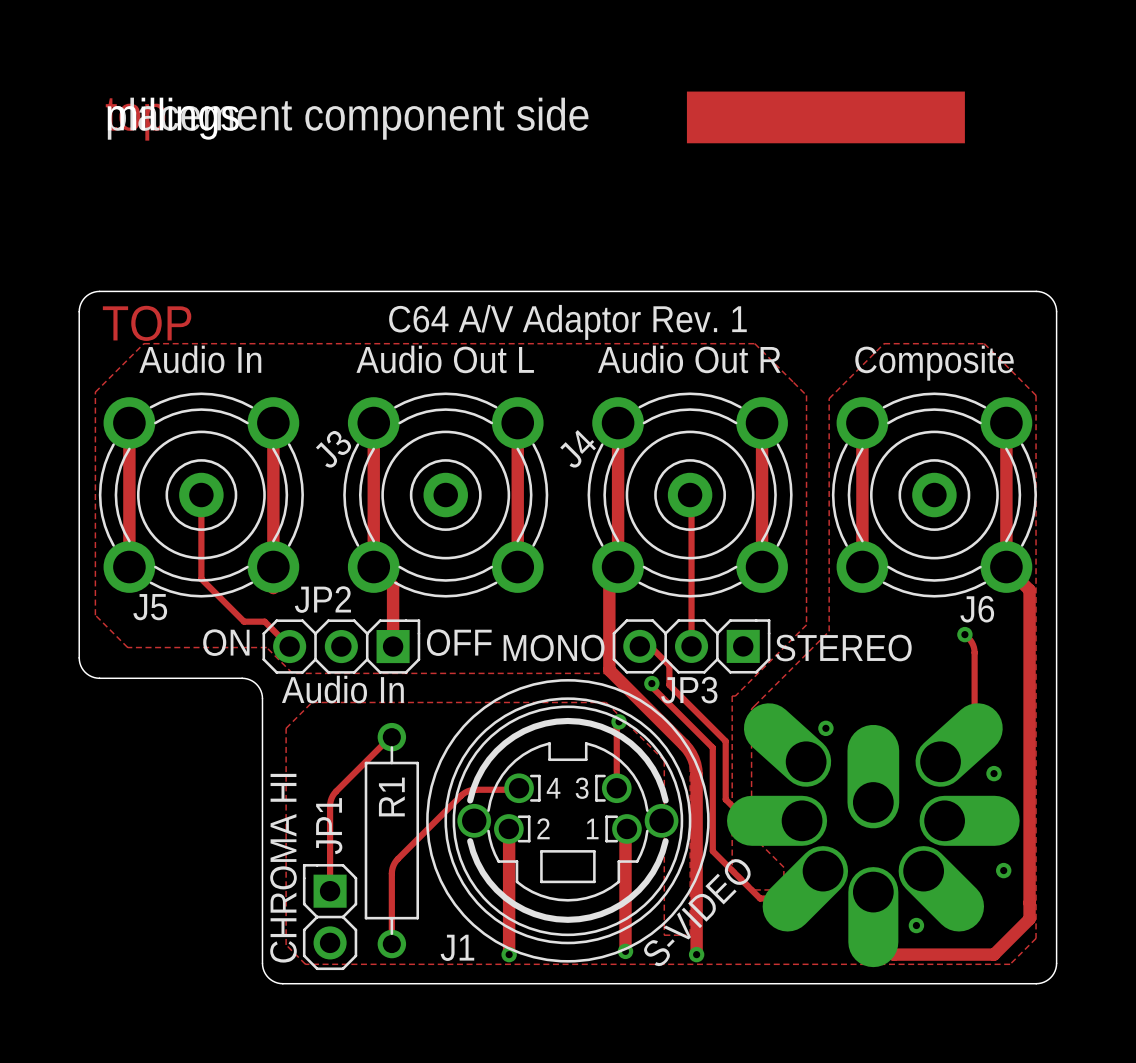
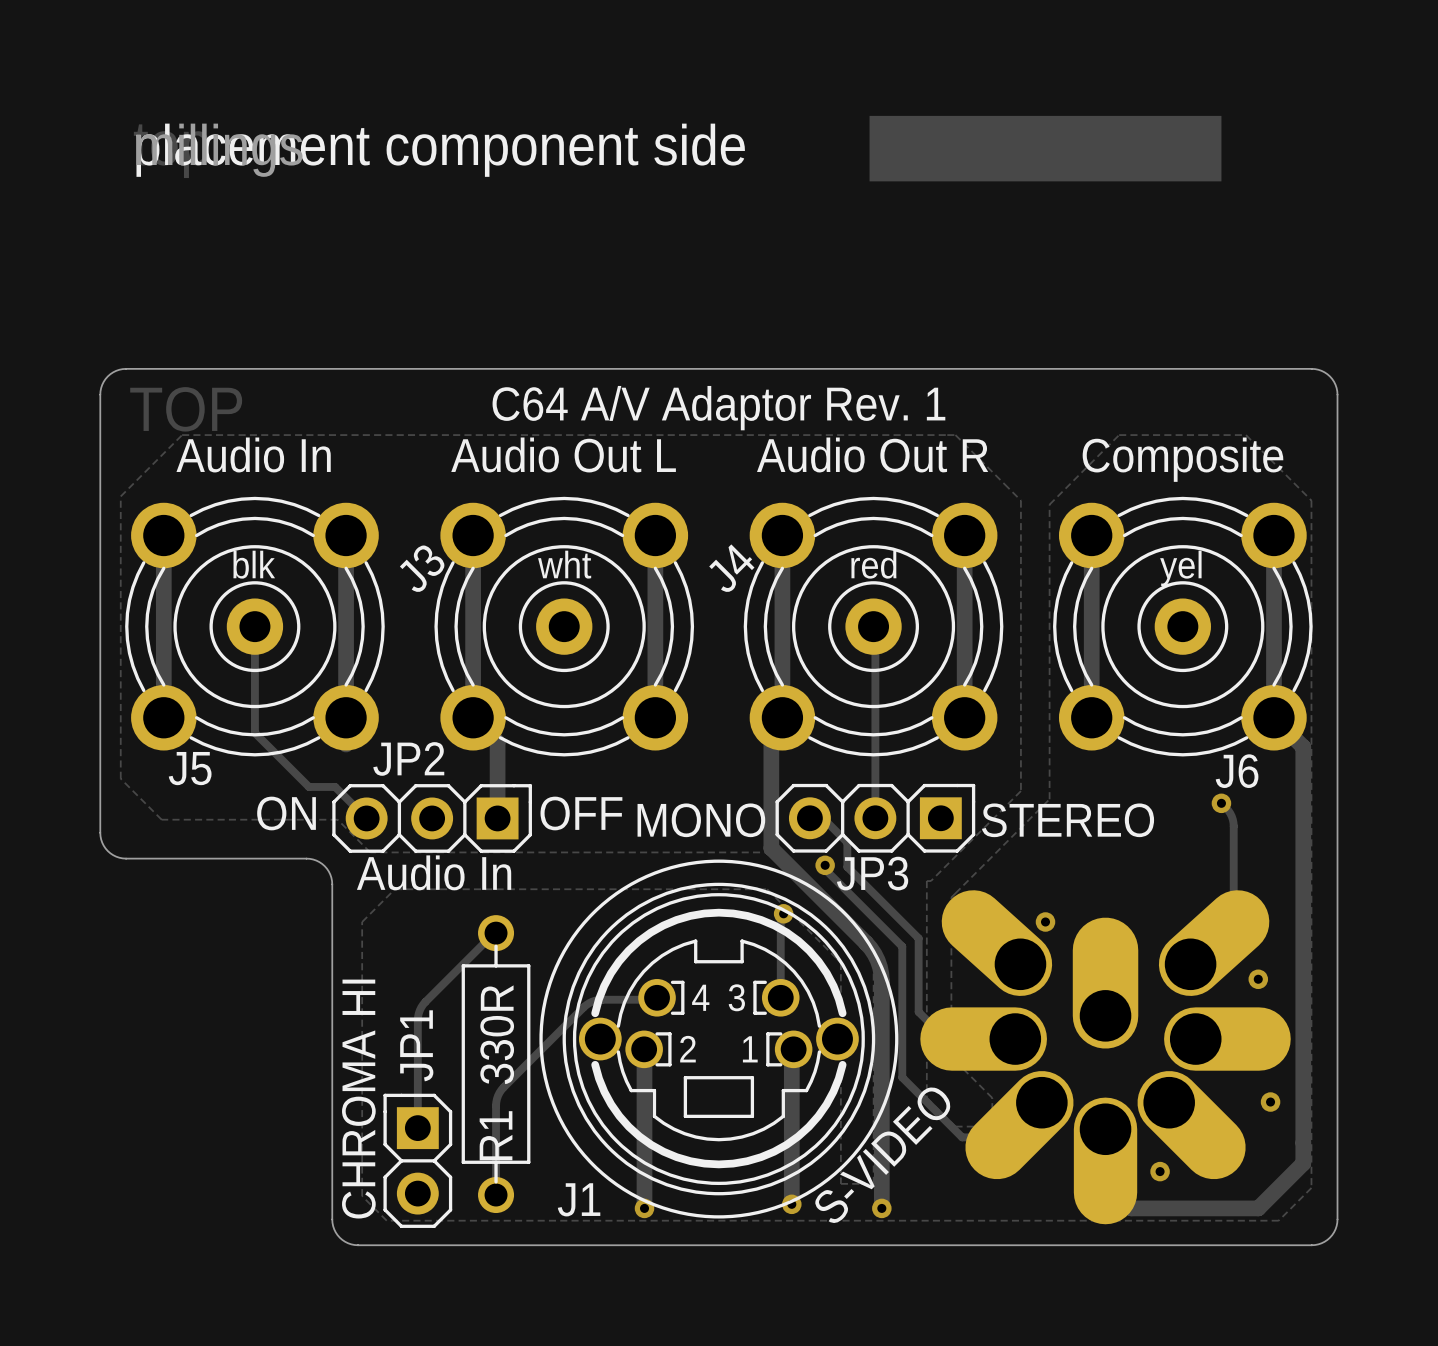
text: none -> blk (254, 564)
text: none -> wht (564, 564)
text: none -> red (873, 564)
text: none -> yel (1180, 568)
R1 name position: R1 (391, 797) -> R1 (496, 1135)
text: none -> 330R (497, 1034)

